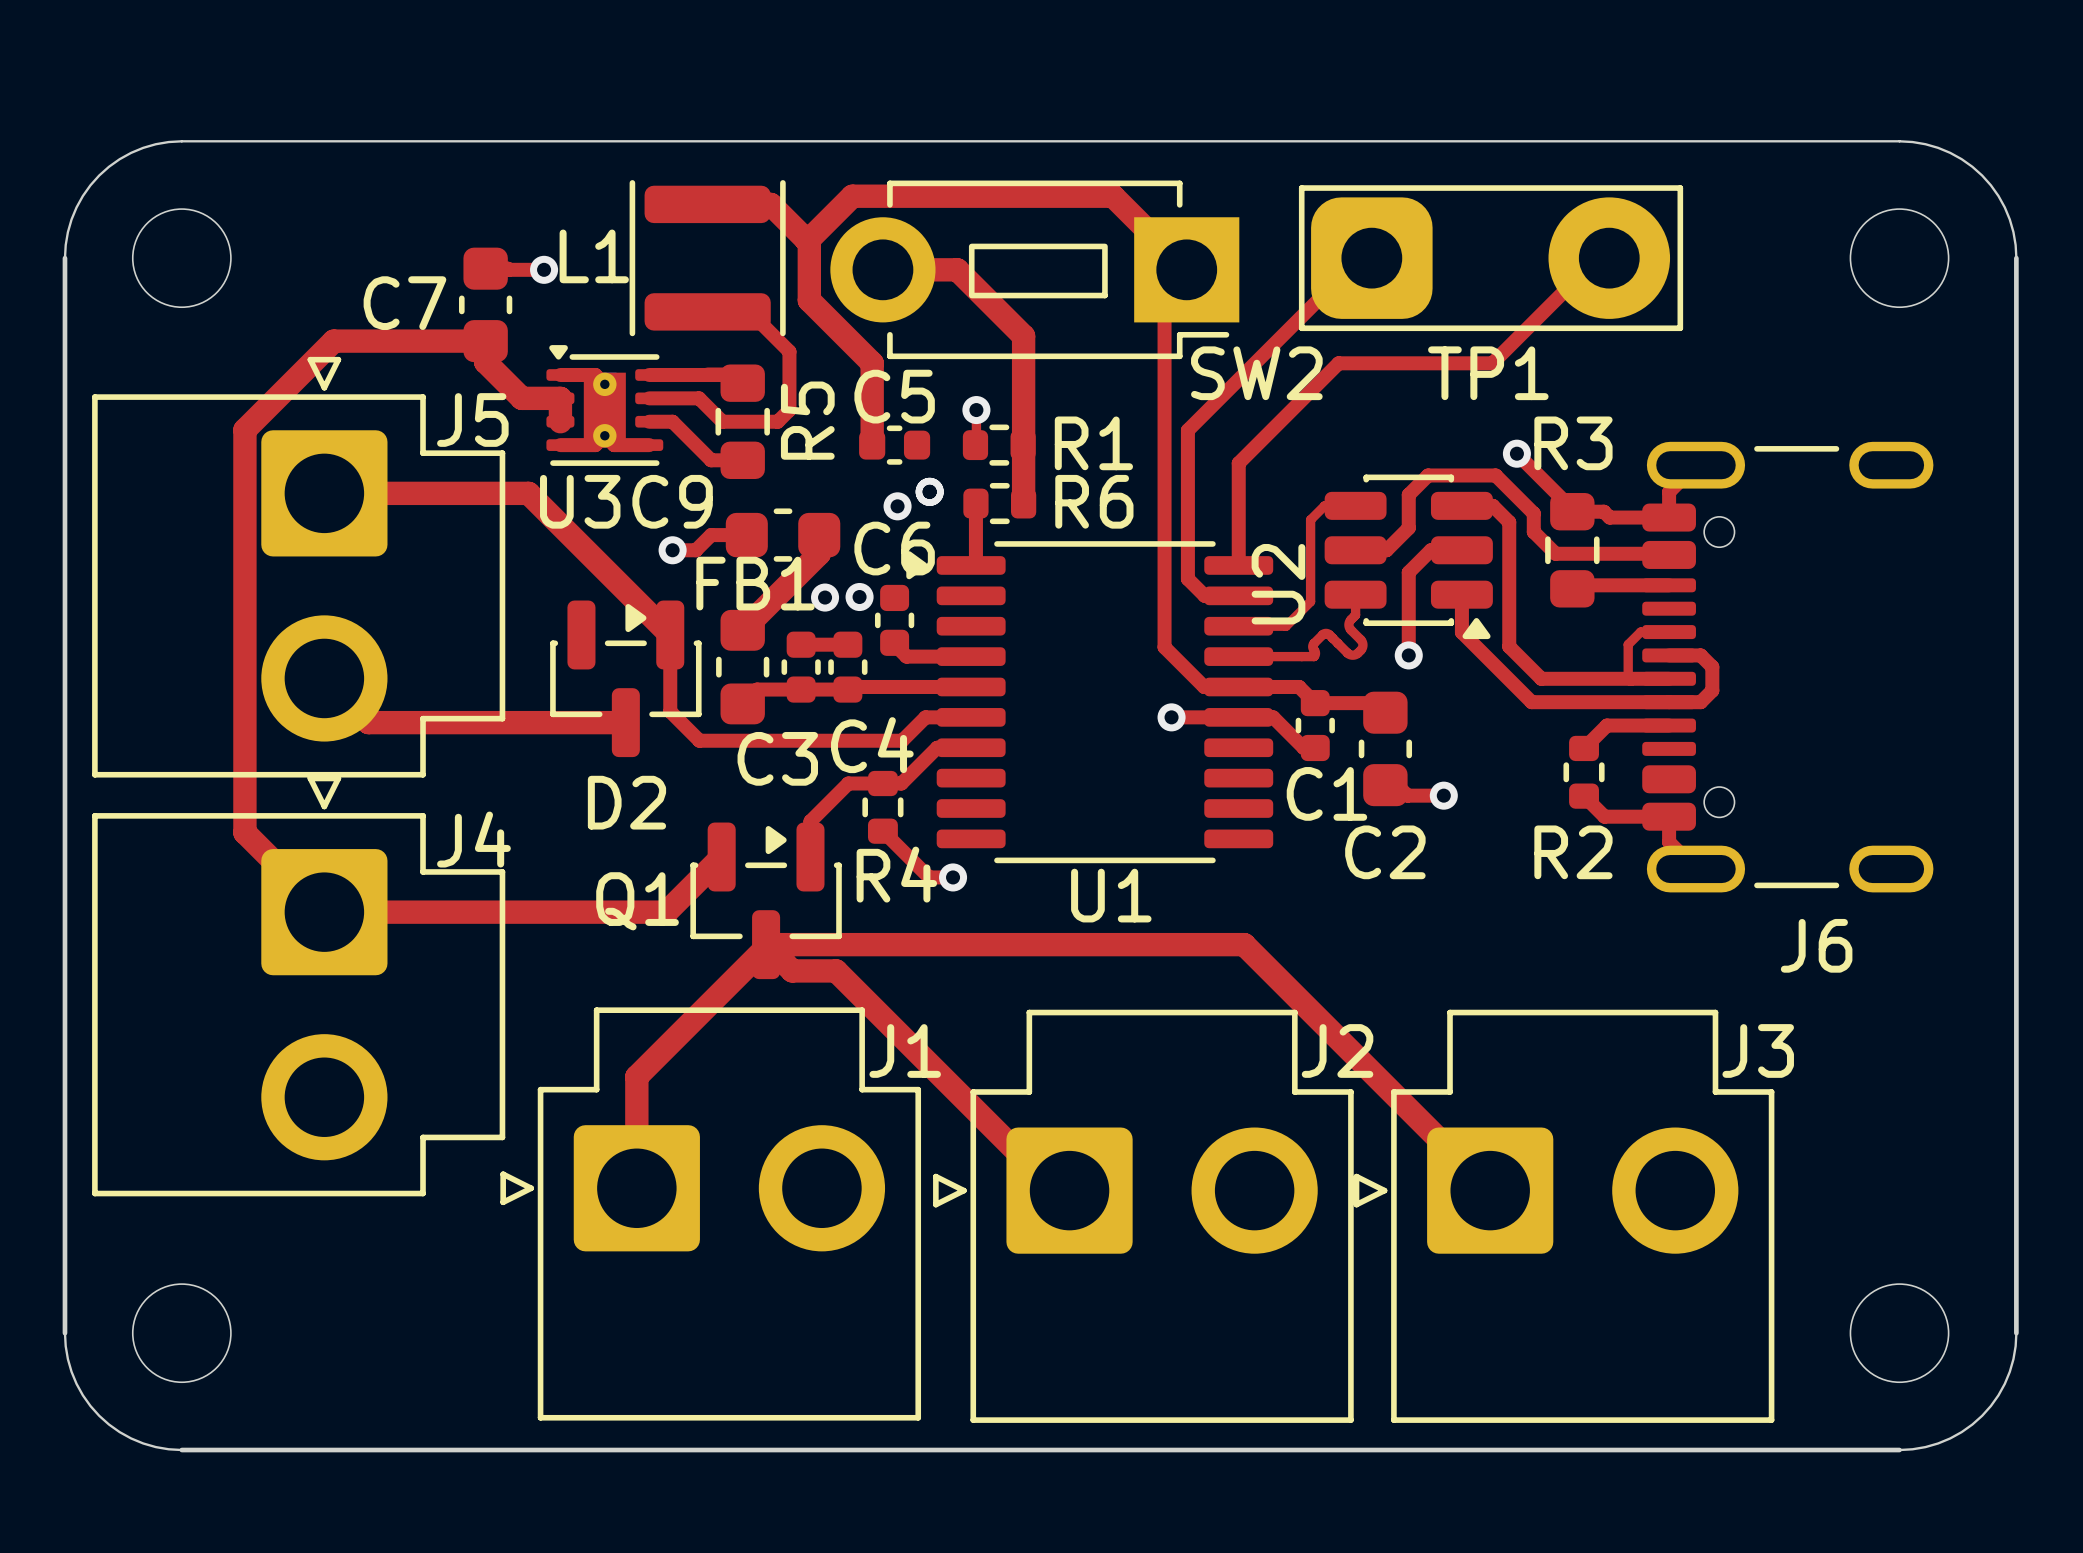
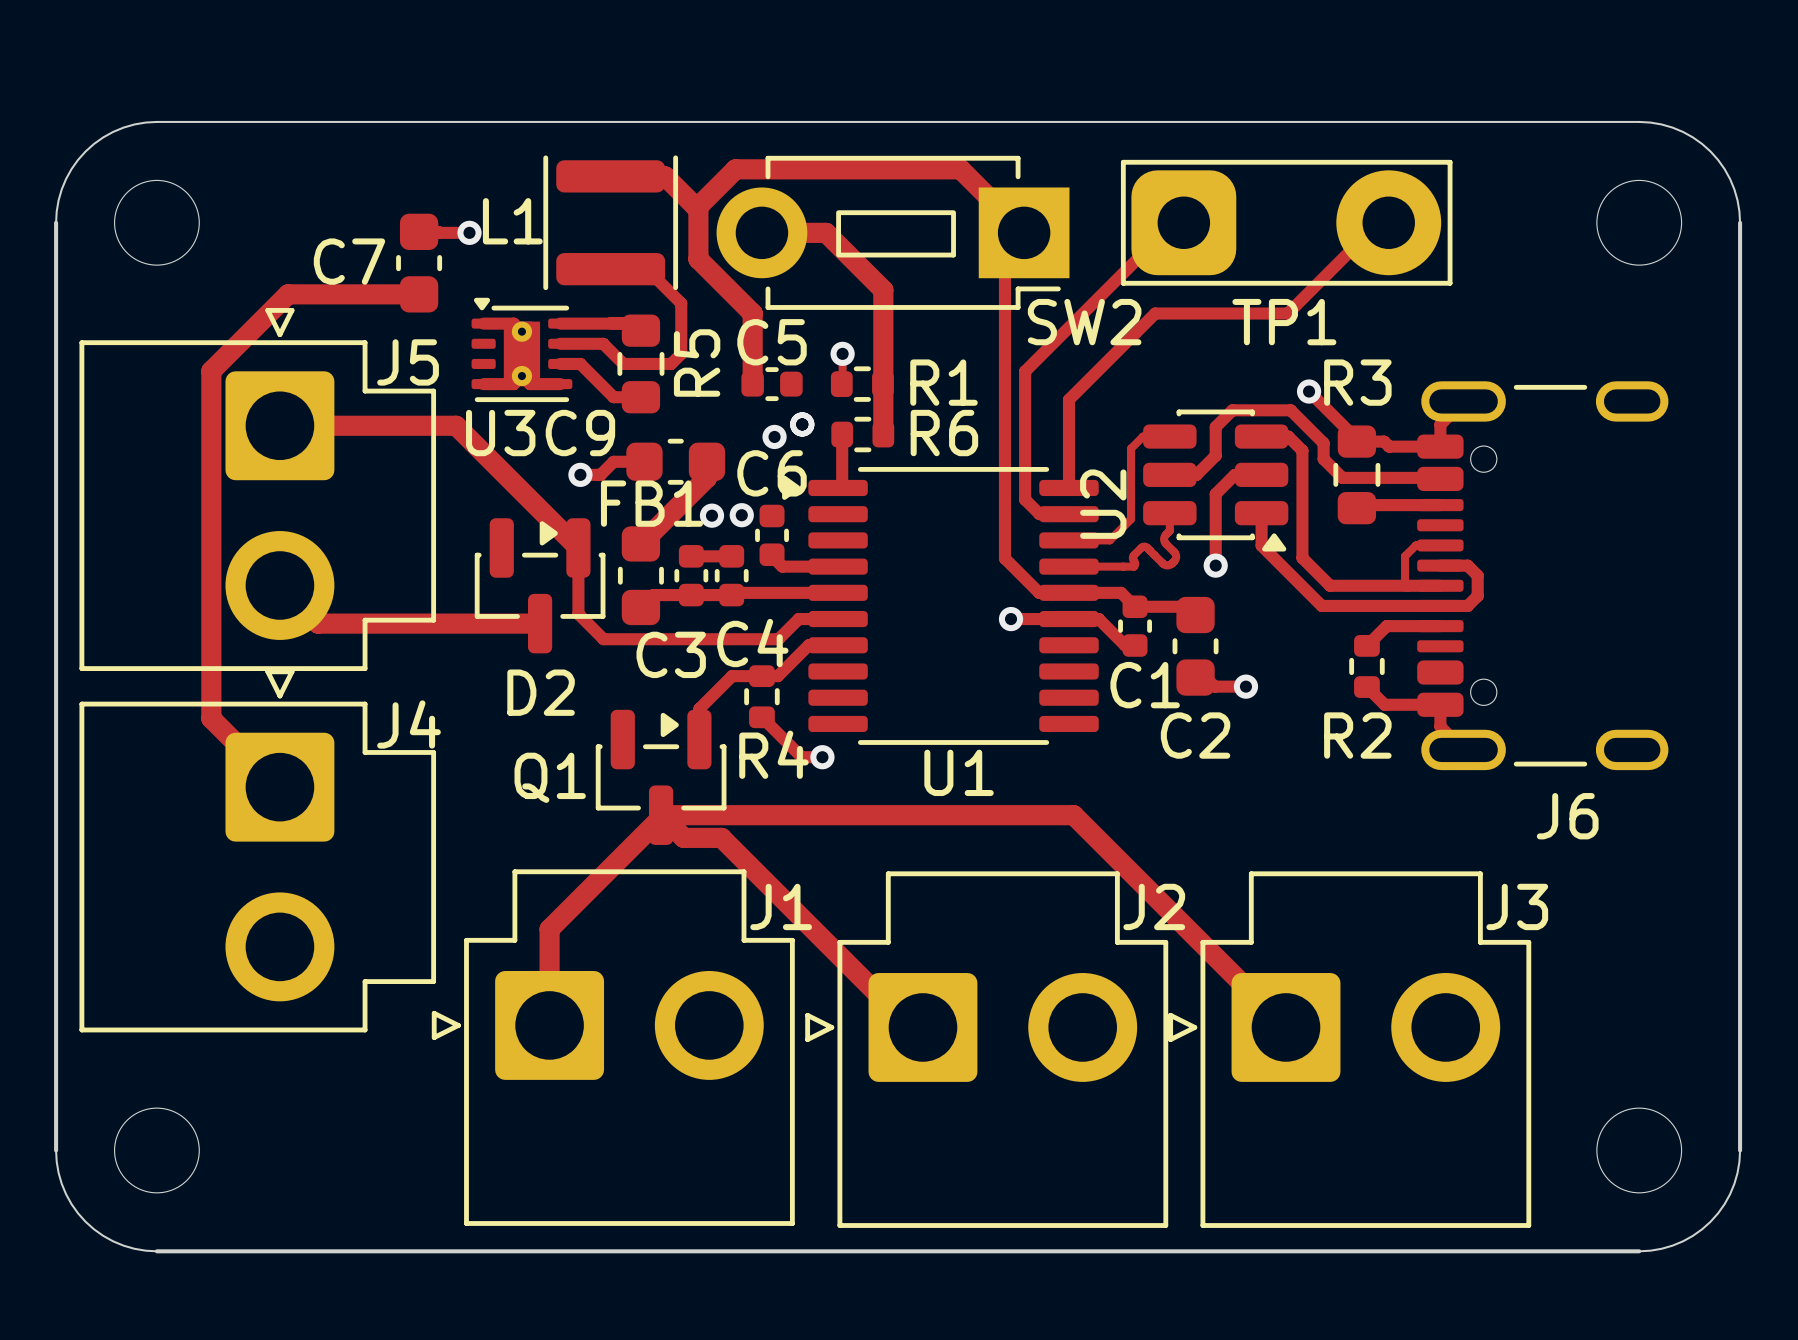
top track: (485, 341) (485, 362) (521, 398) (560, 398) (560, 421) -> none
top track: (721, 857) (666, 912) (324, 912) -> none

